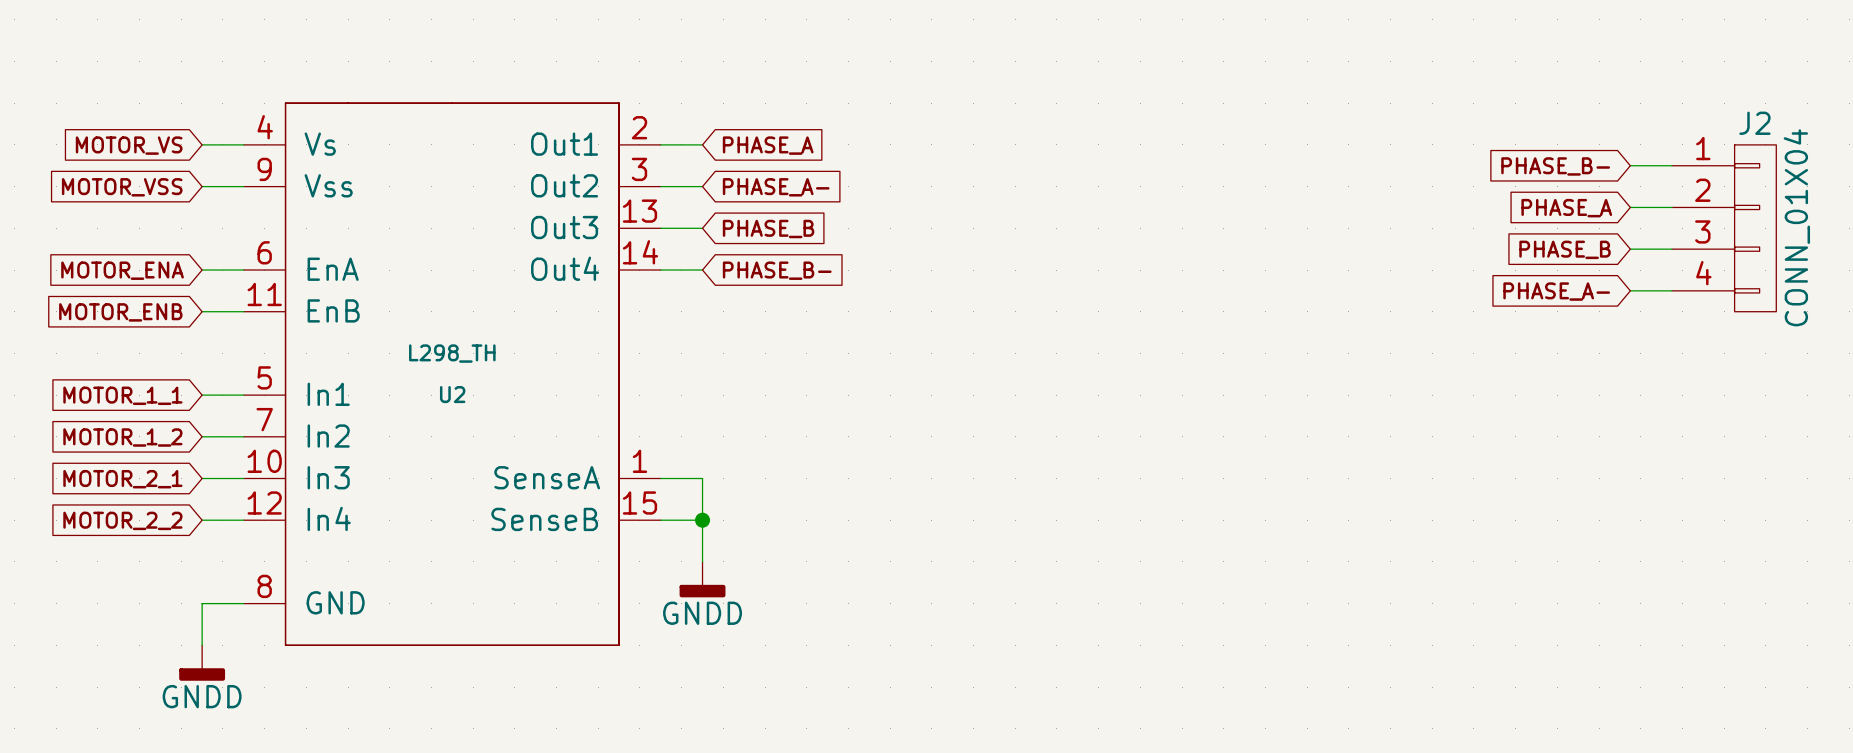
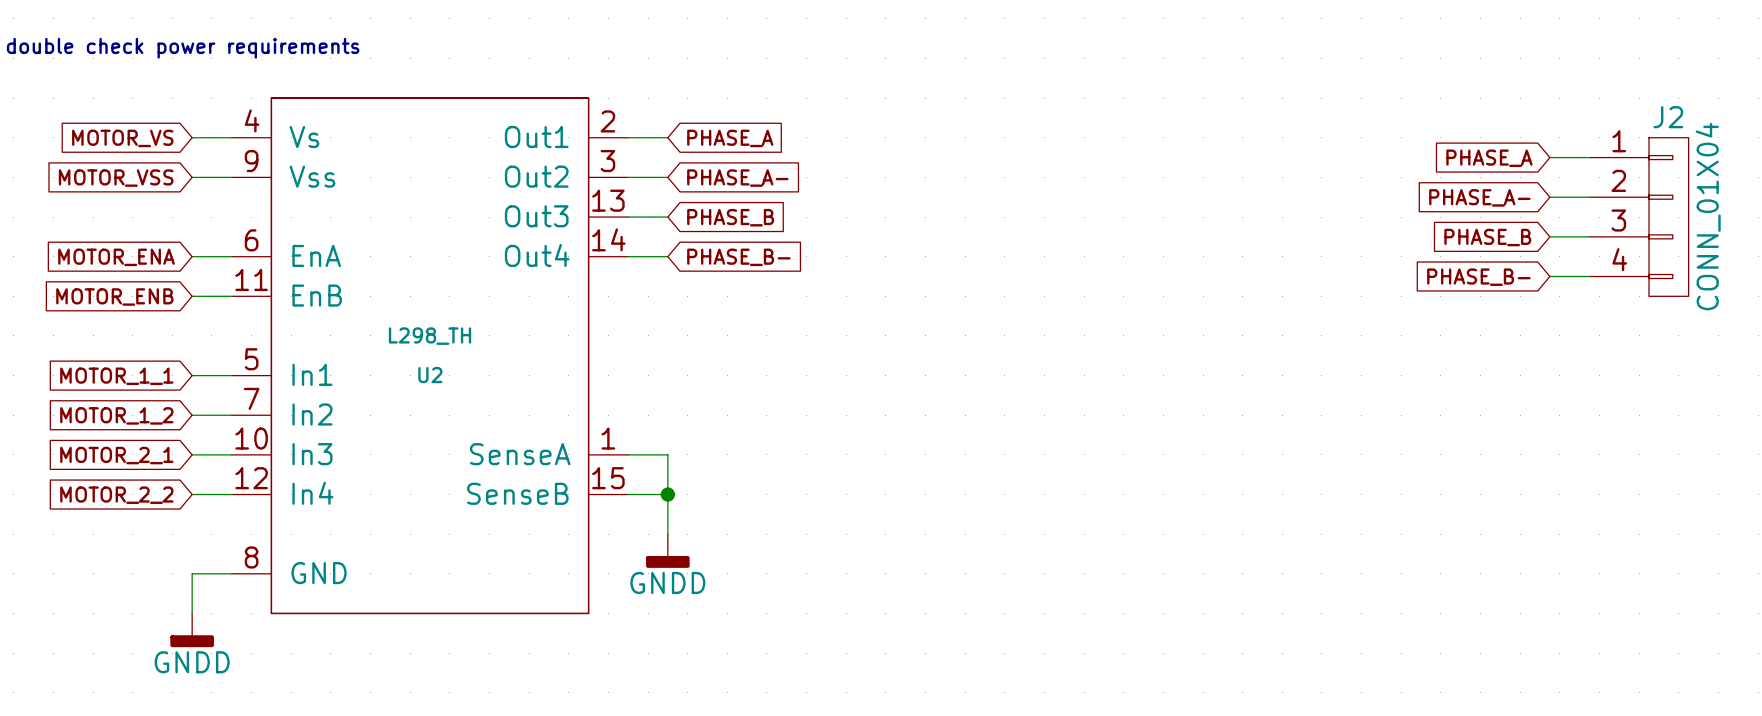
text: none -> double check power requirements (183, 48)
global label: PHASE_B- (1555, 166) -> PHASE_A (1489, 158)
global label: PHASE_A (1566, 208) -> PHASE_A- (1479, 197)
global label: PHASE_A- (1556, 291) -> PHASE_B- (1478, 277)

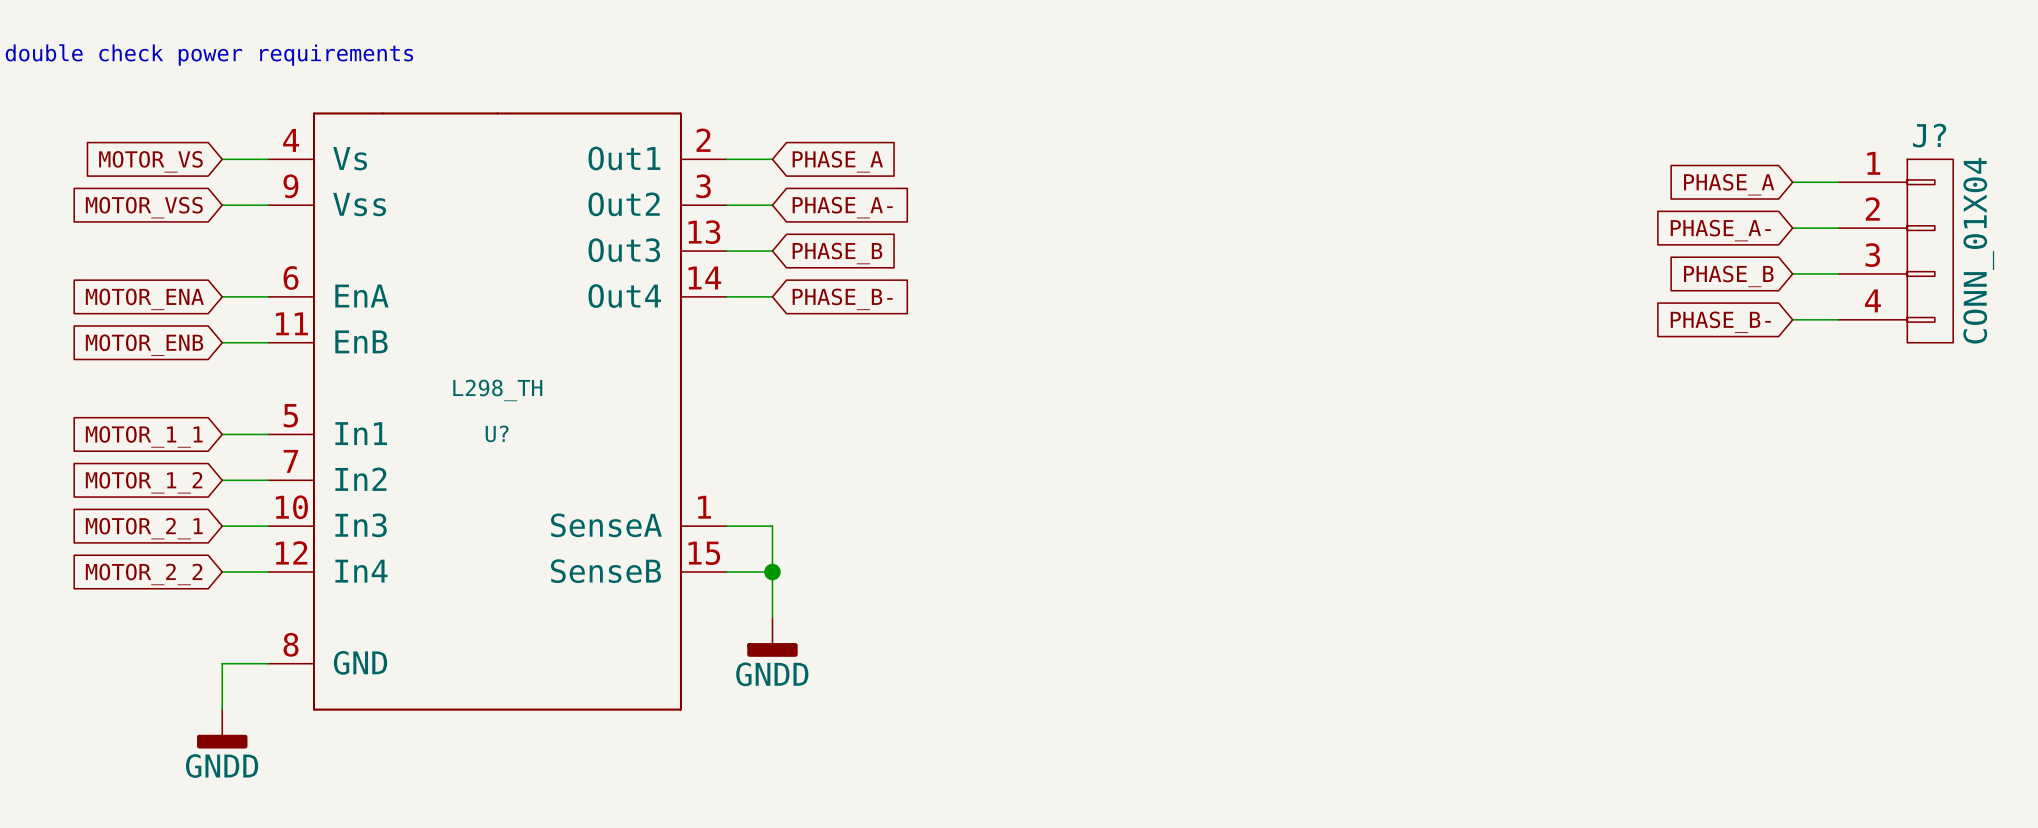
J2 name: J2 (1668, 117) -> J? (1929, 135)
U2 name: U2 (430, 375) -> U? (497, 433)

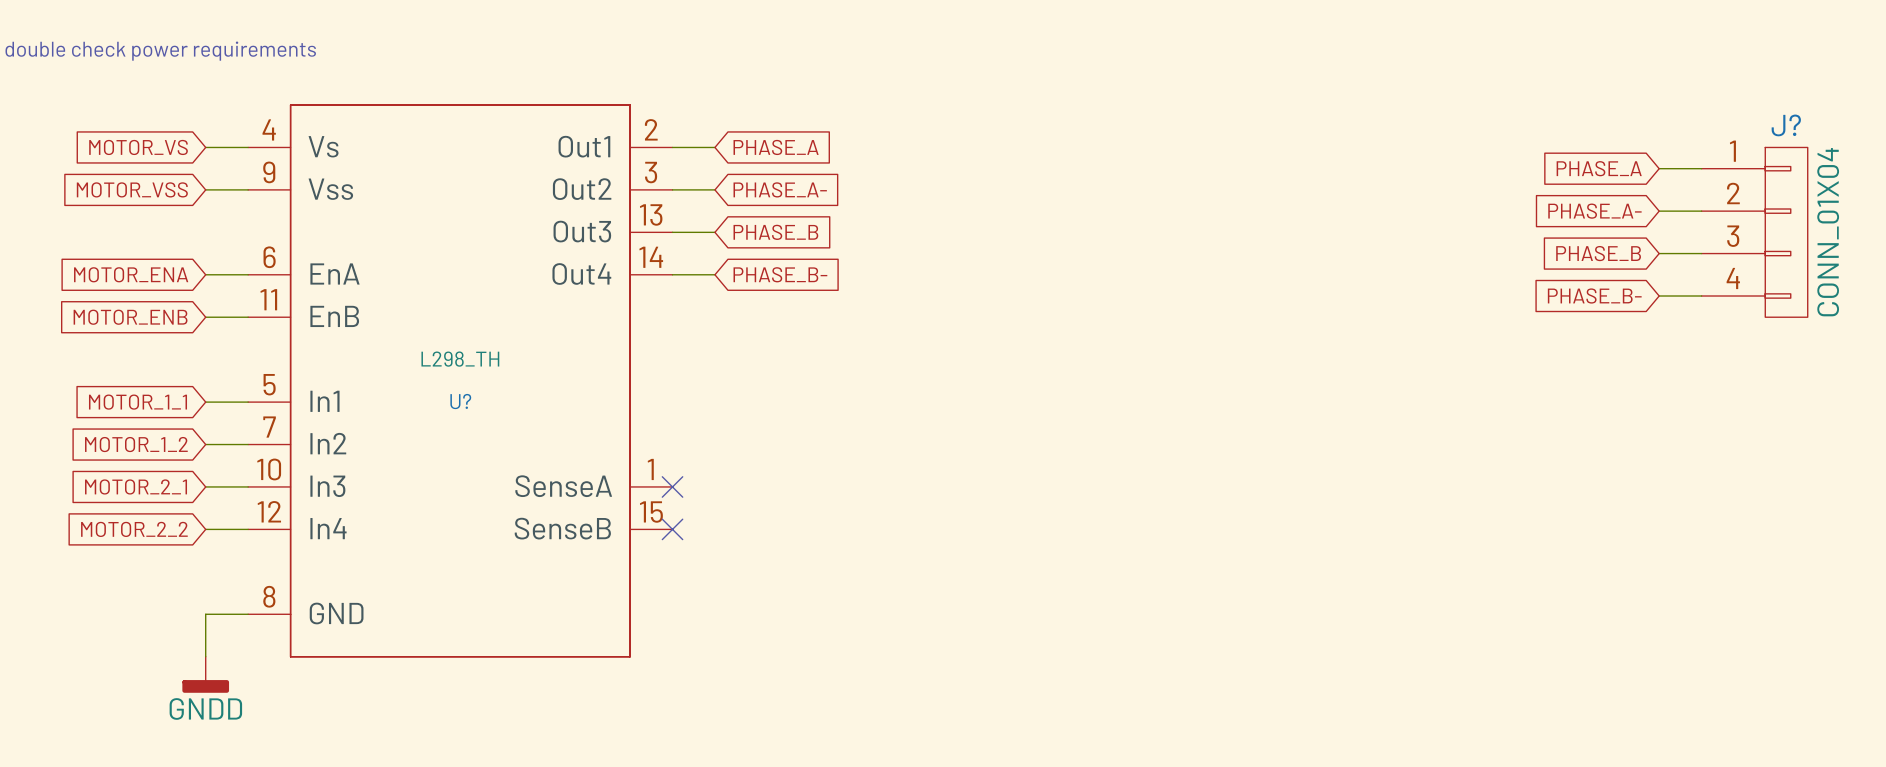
wire: (726, 526) (772, 526) (772, 617) -> none
no-connect mark: none -> (672, 486)
wire: (726, 572) (772, 572) -> none
no-connect mark: none -> (672, 529)
junction: (772, 572) -> none
power symbol: GNDD (772, 637) -> none

